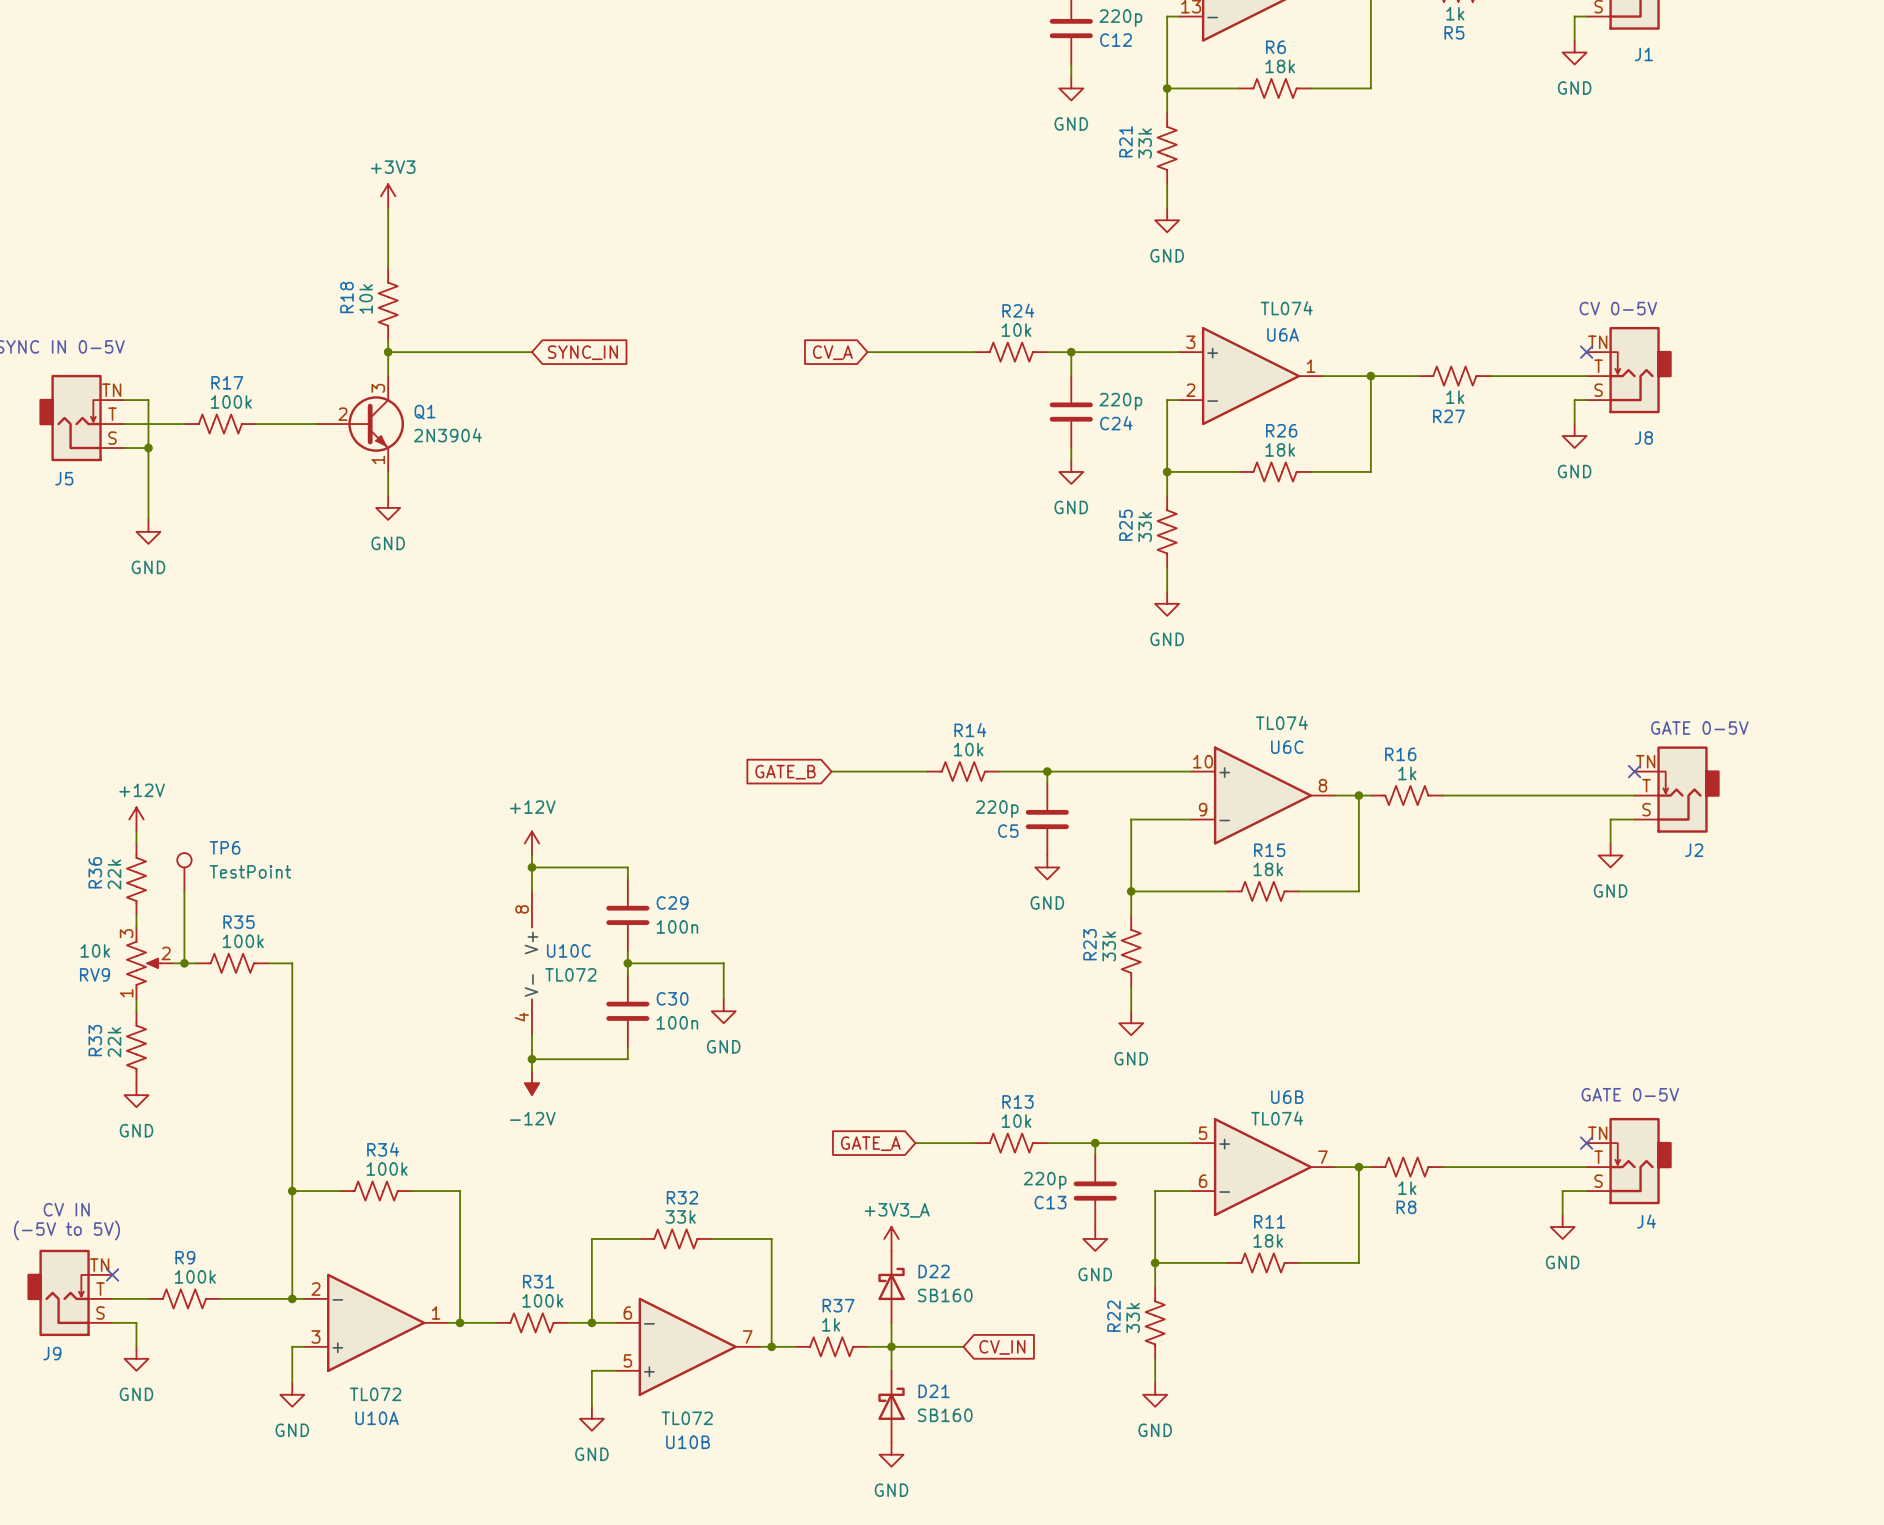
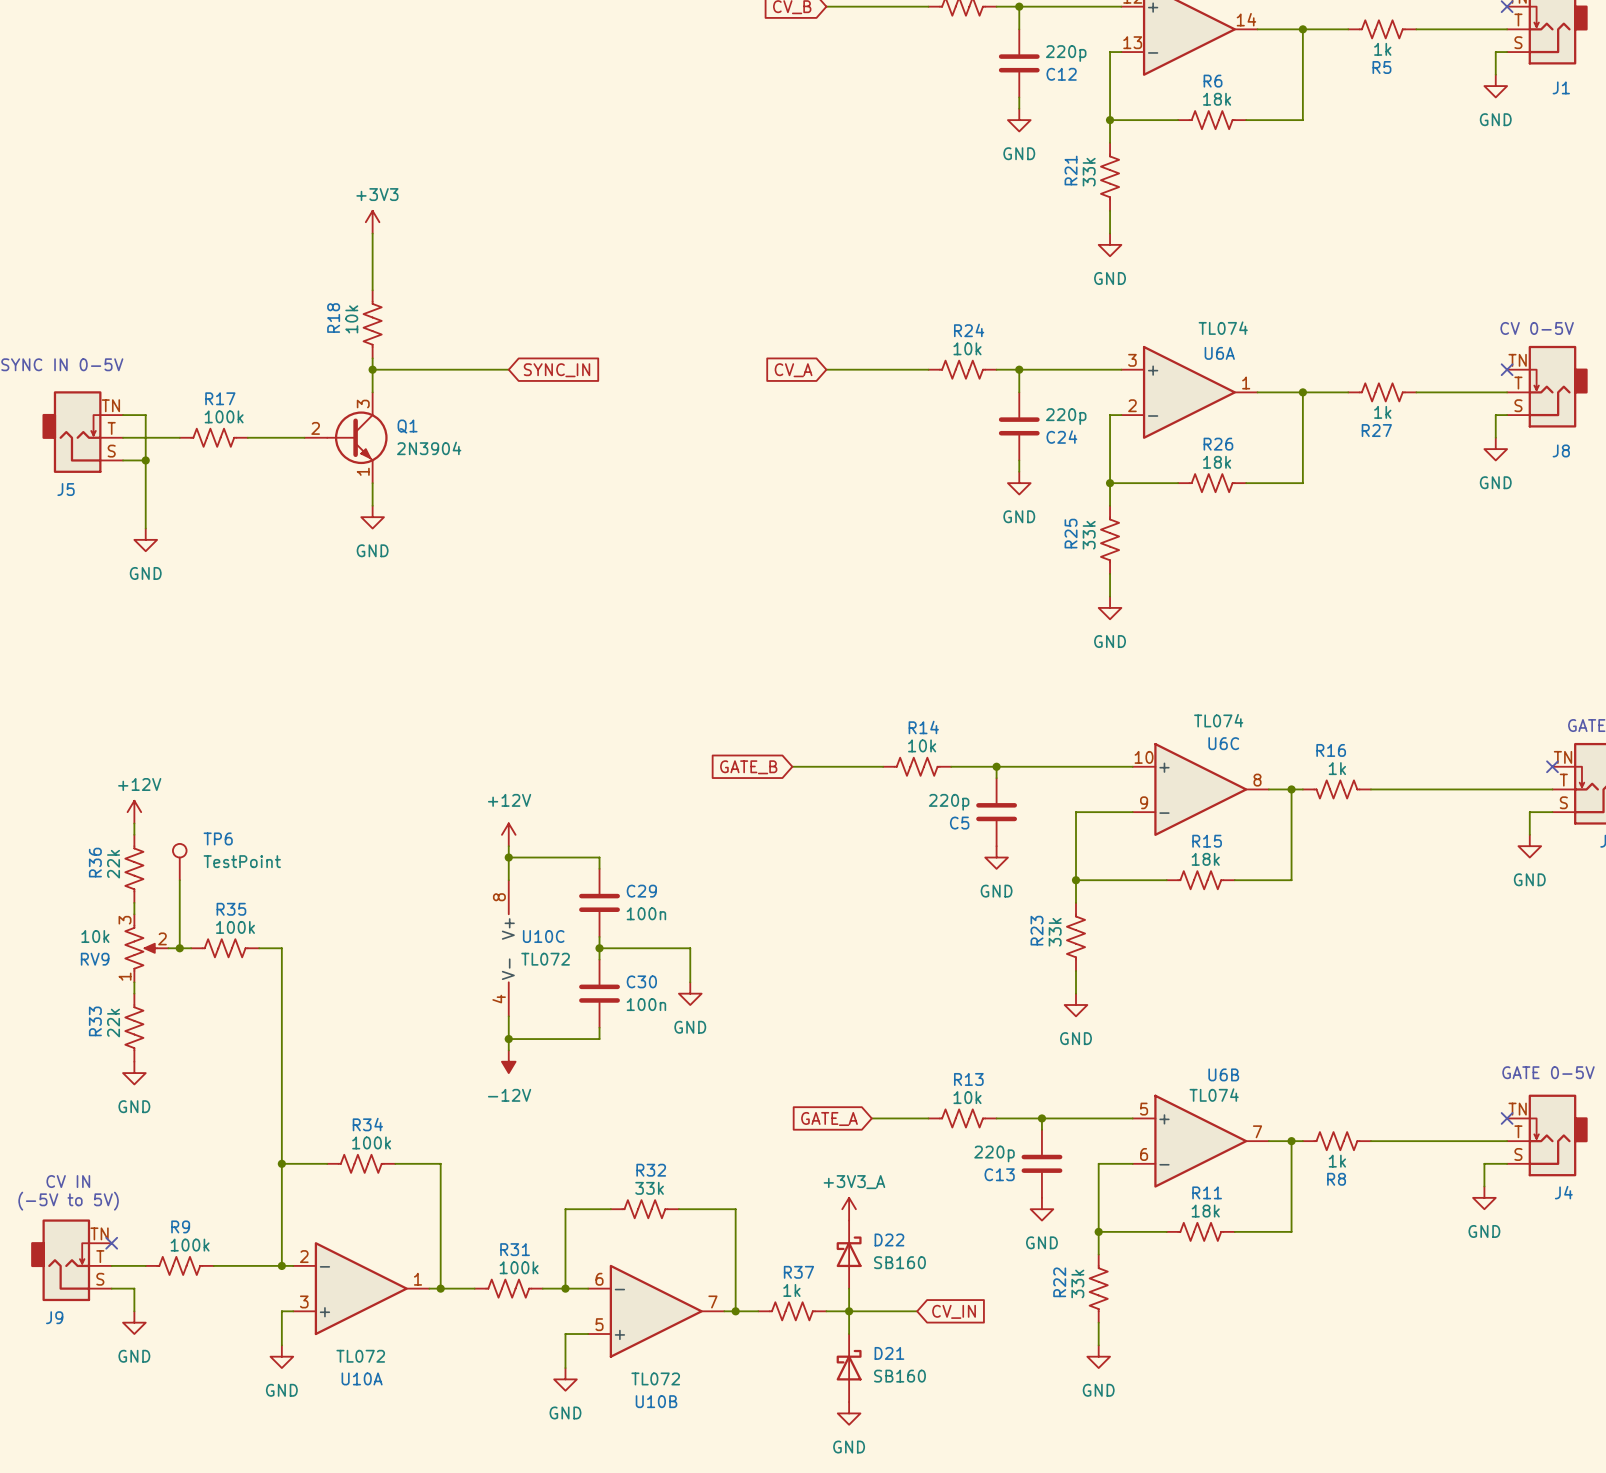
Q1 symbol: [316, 376, 404, 472] -> [304, 392, 388, 484]

